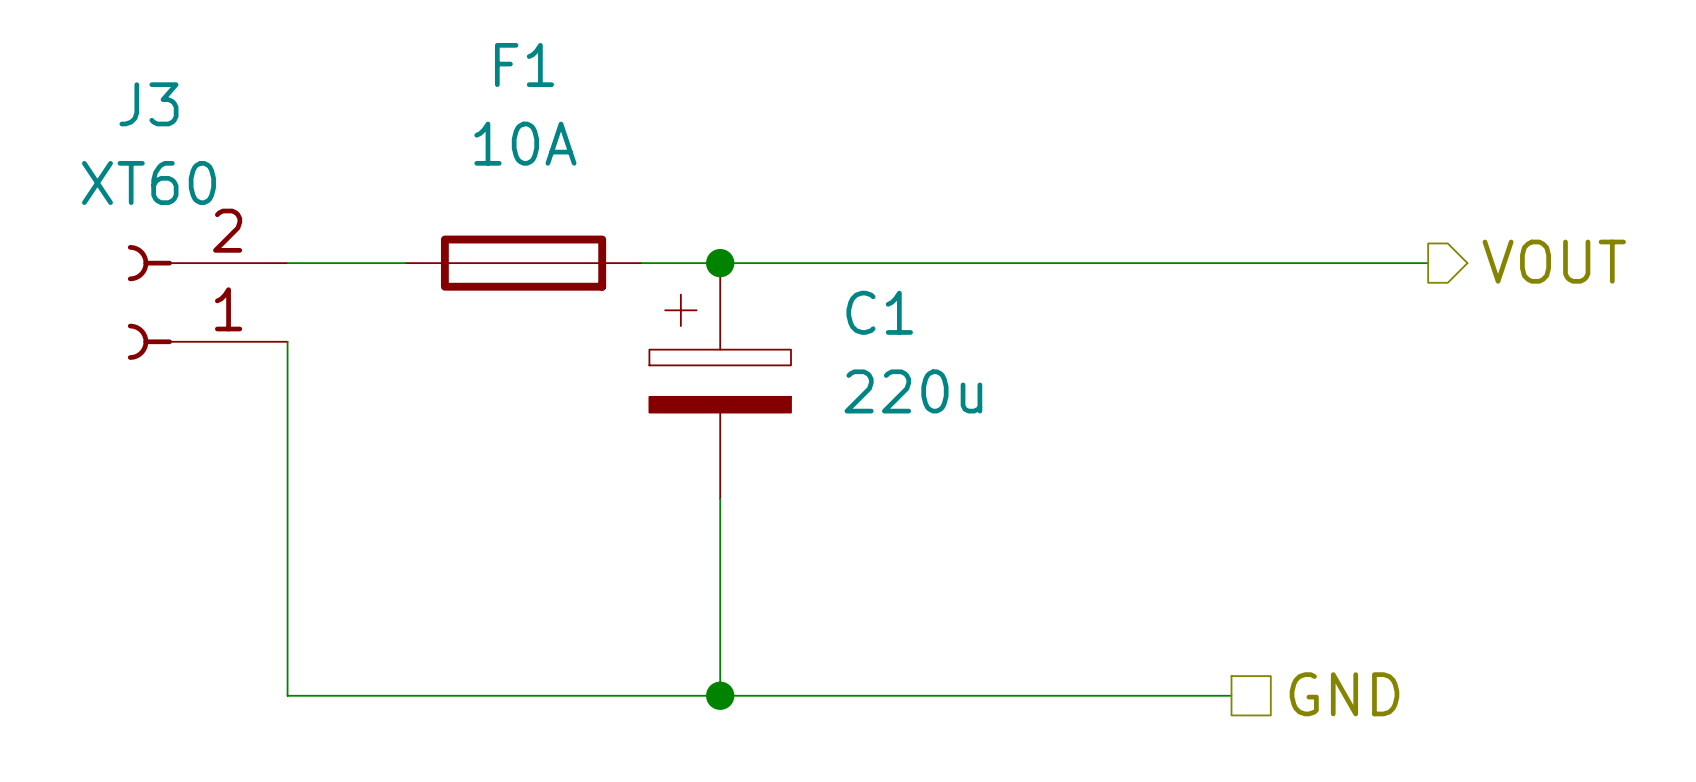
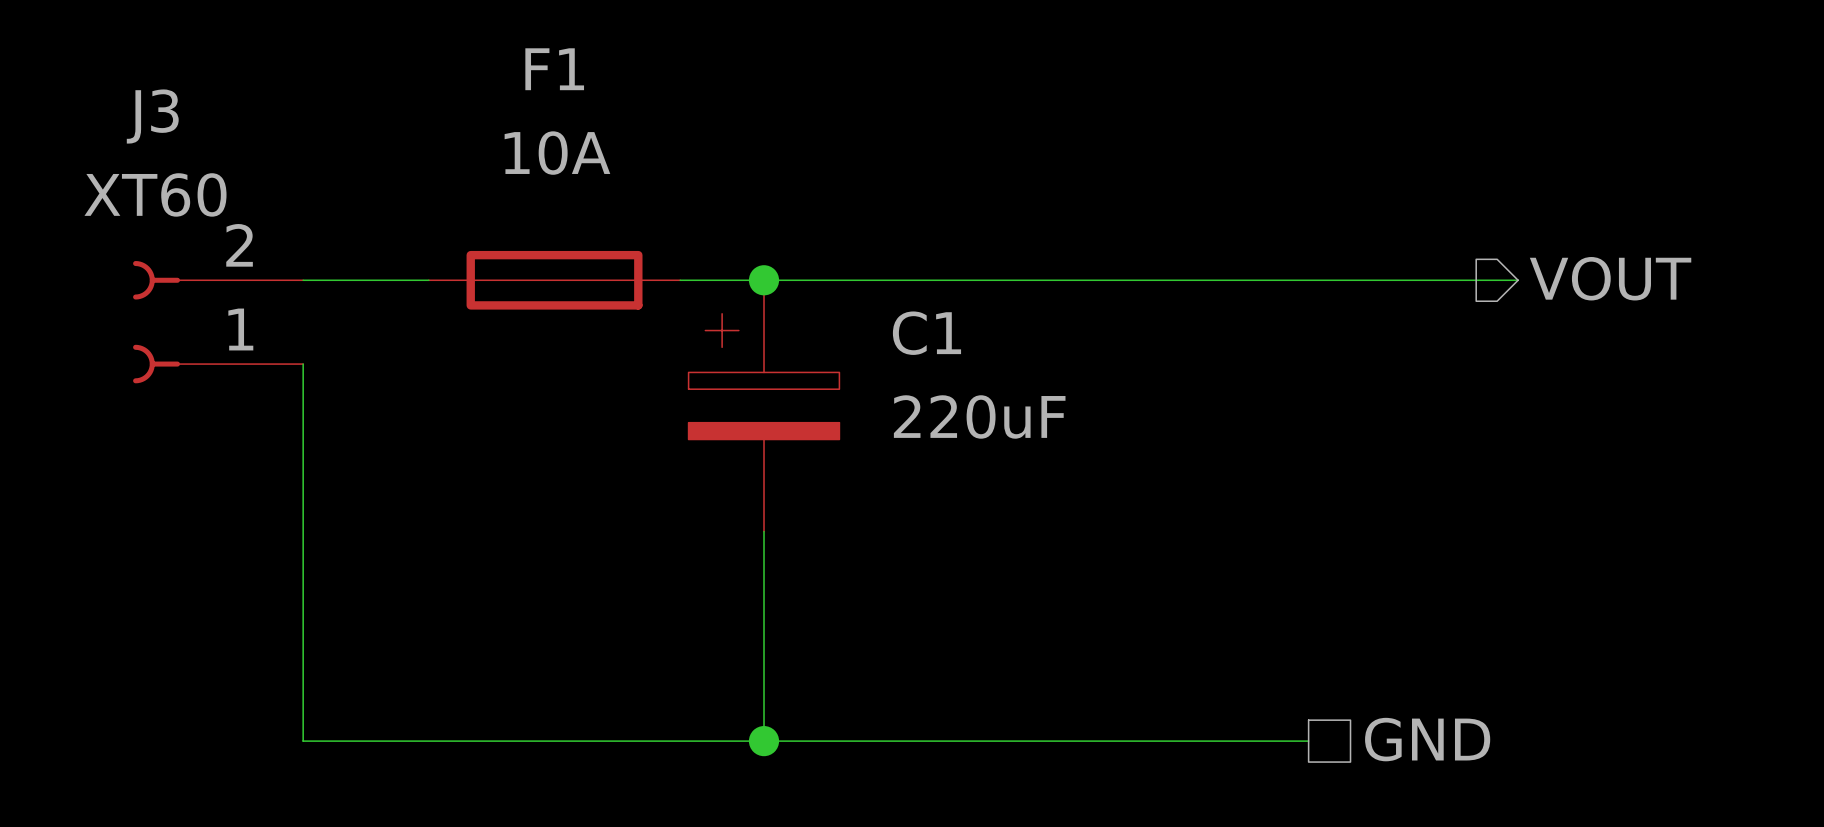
hierarchical label position: VOUT (1554, 261) -> VOUT (1610, 278)
C1 value: 220u (913, 391) -> 220uF (979, 416)

